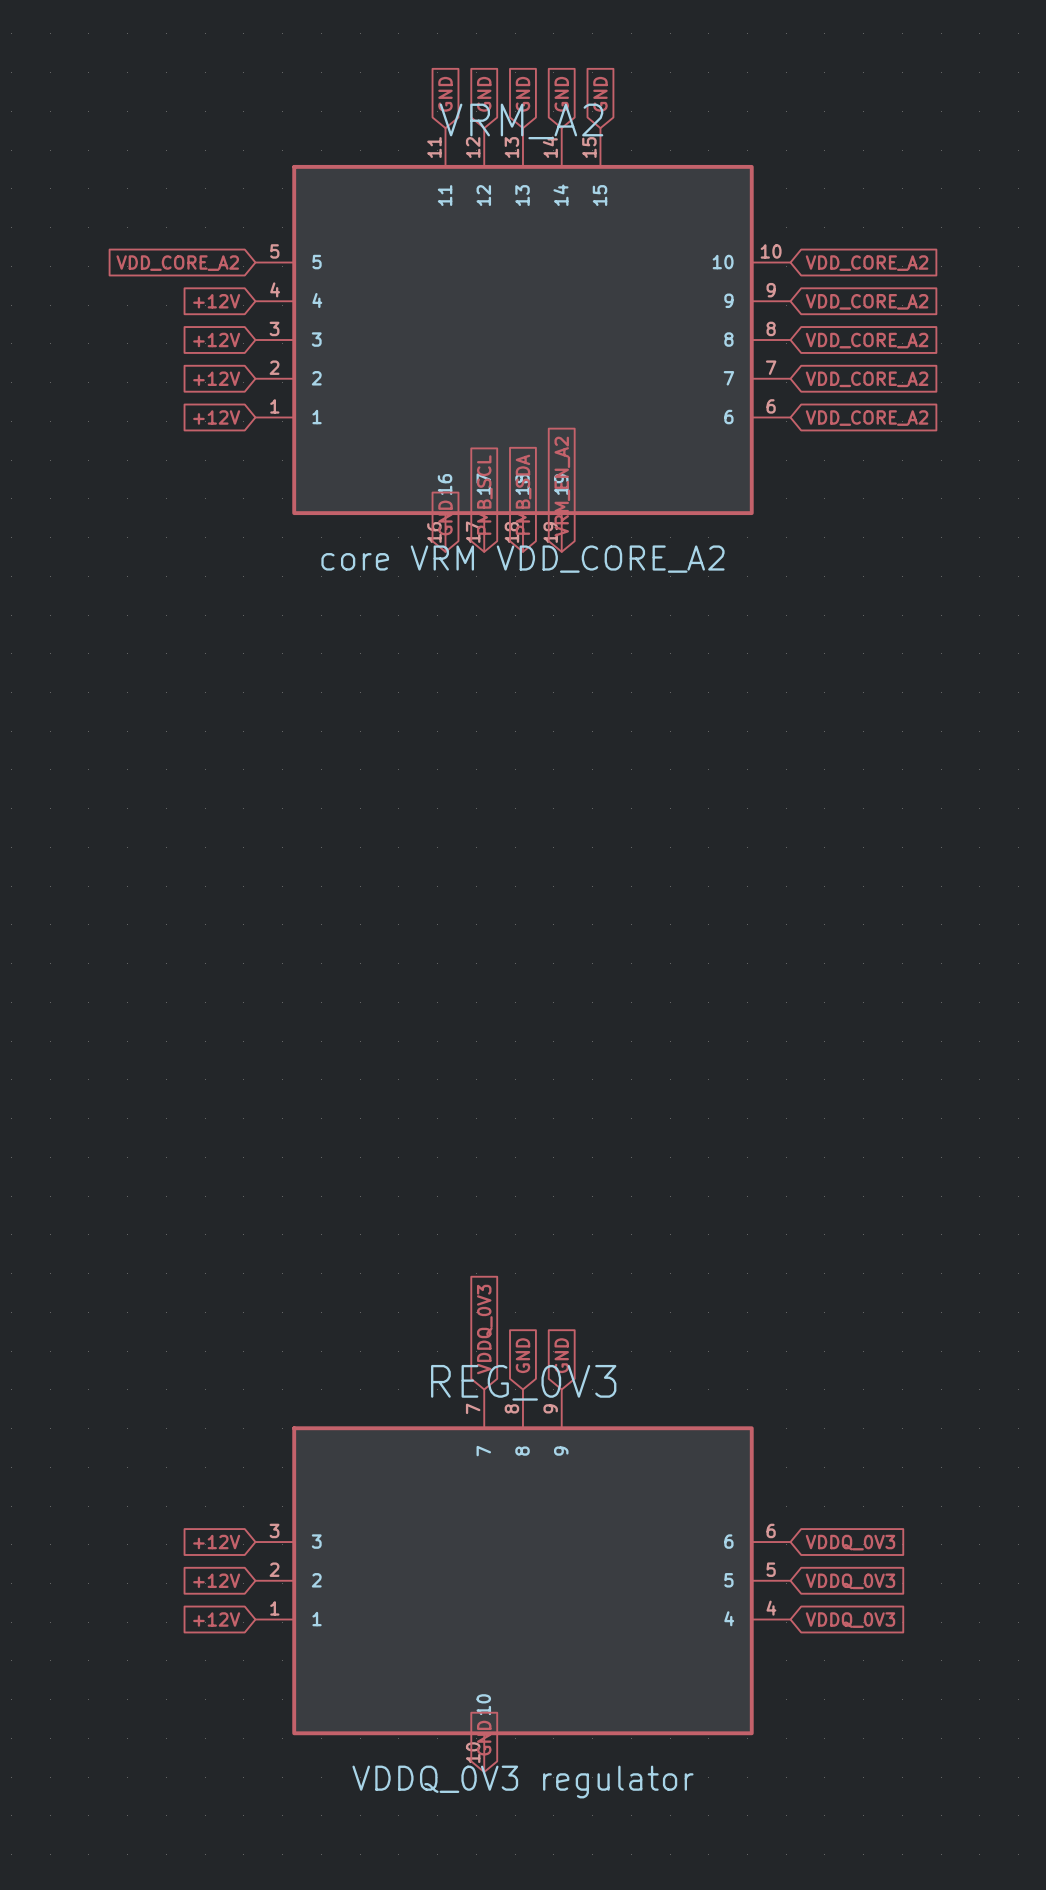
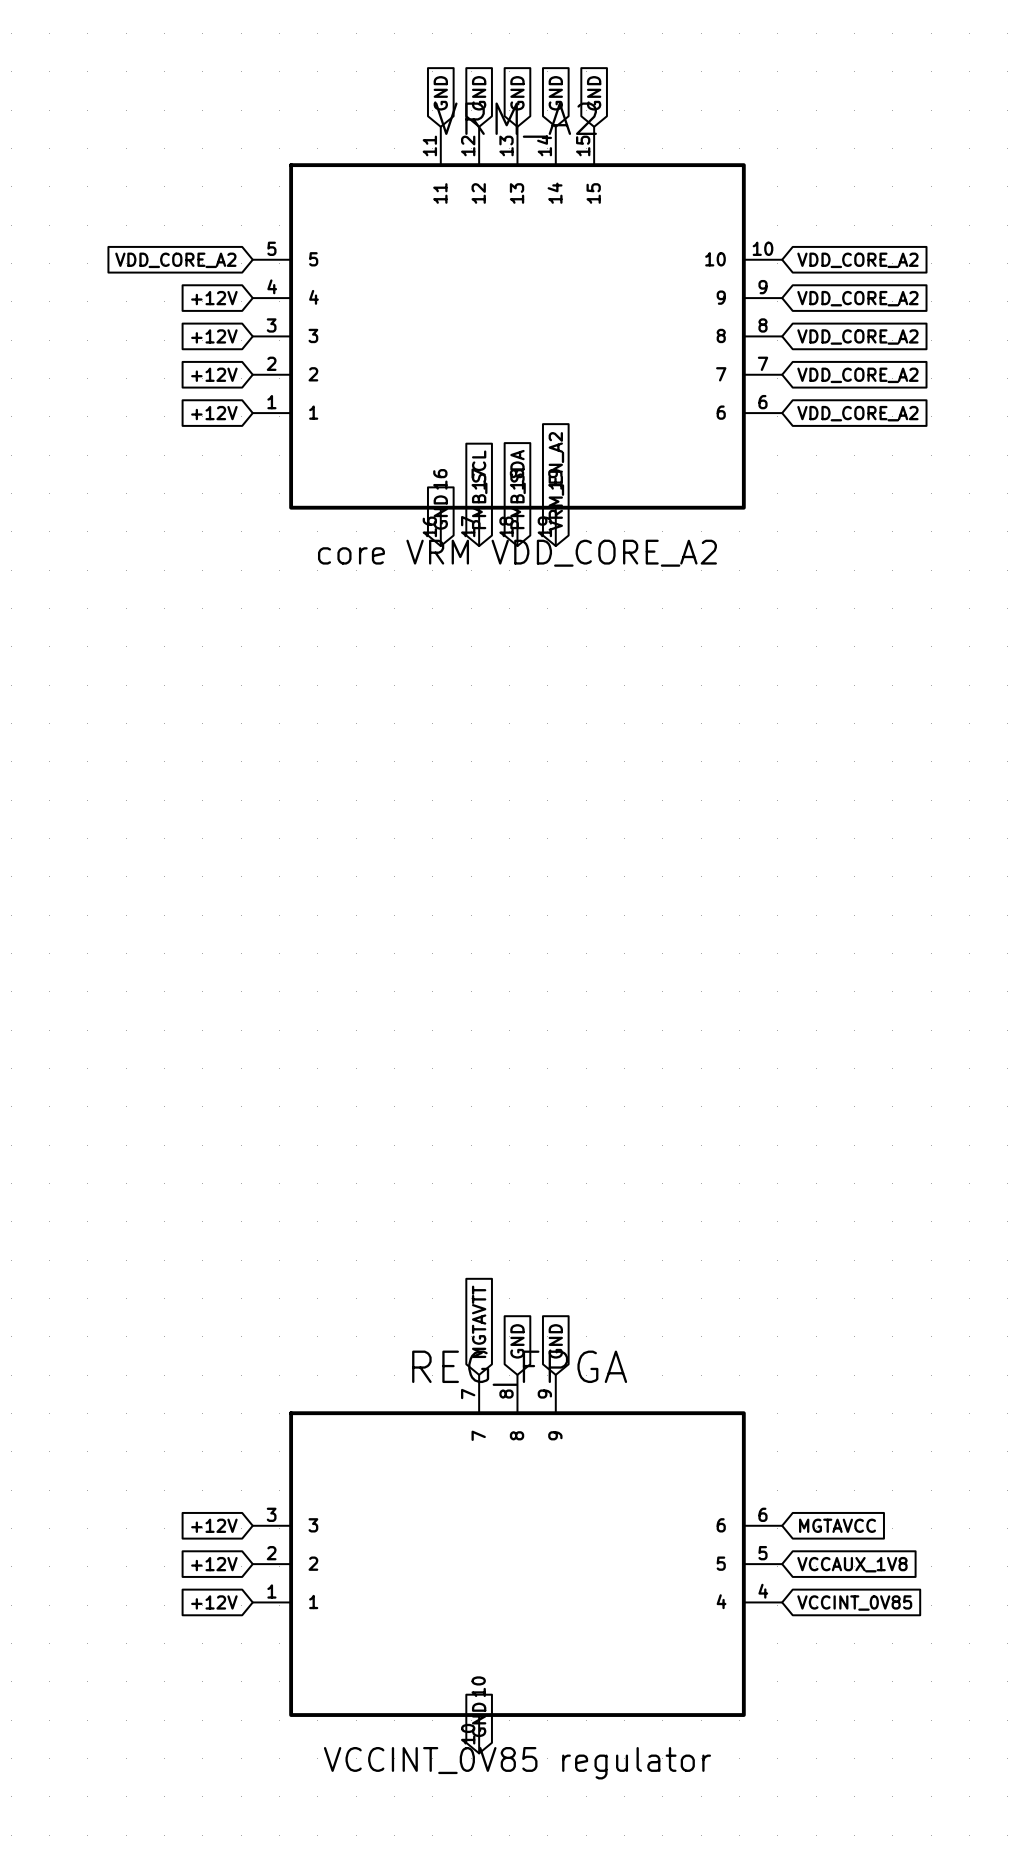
global label: VDDQ_0V3 (484, 1329) -> MGTAVTT (479, 1321)
REG_0V3 name: REG_0V3 (523, 1382) -> REG_FPGA (519, 1368)
global label: VDDQ_0V3 (850, 1542) -> MGTAVCC (837, 1525)
global label: VDDQ_0V3 (850, 1581) -> VCCAUX_1V8 (852, 1564)
global label: VDDQ_0V3 (850, 1620) -> VCCINT_0V85 (854, 1603)
REG_0V3 value: VDDQ_0V3 regulator (522, 1782) -> VCCINT_0V85 regulator (517, 1763)

